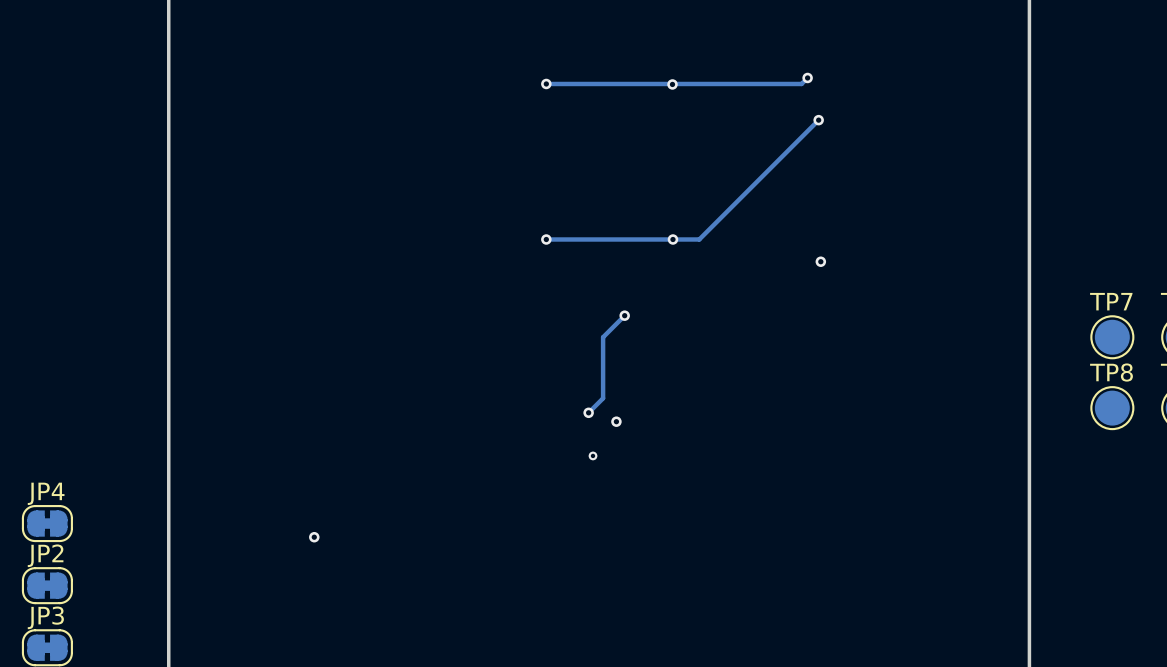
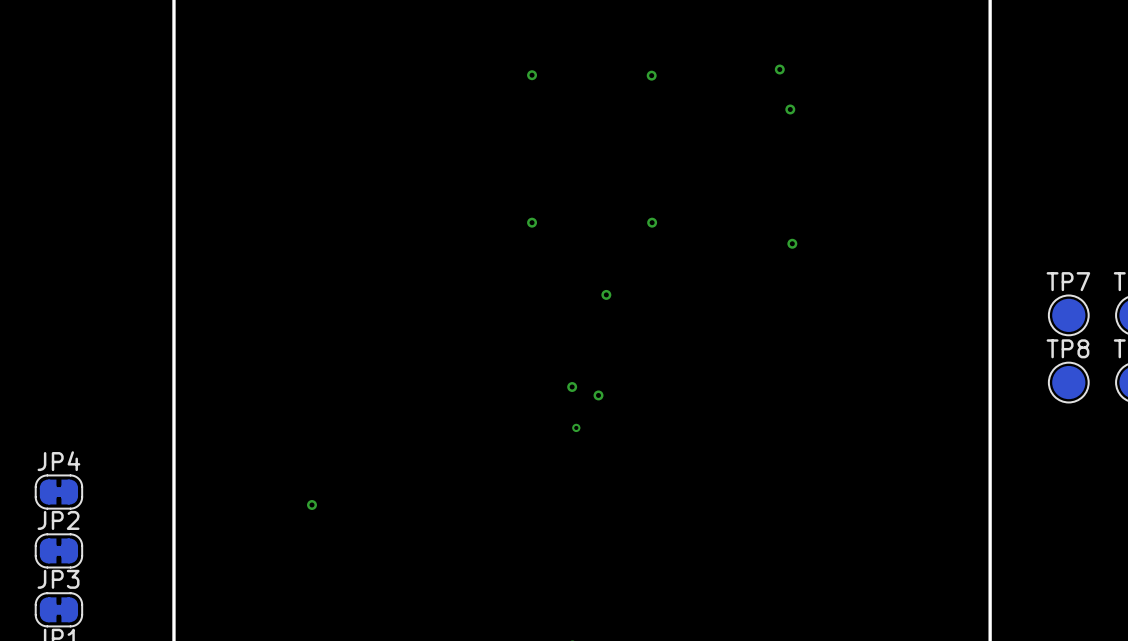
track: (807, 77) (801, 83) (546, 83) -> none
track: (818, 120) (699, 239) (546, 239) -> none
track: (624, 315) (603, 337) (603, 398) (588, 412) -> none

